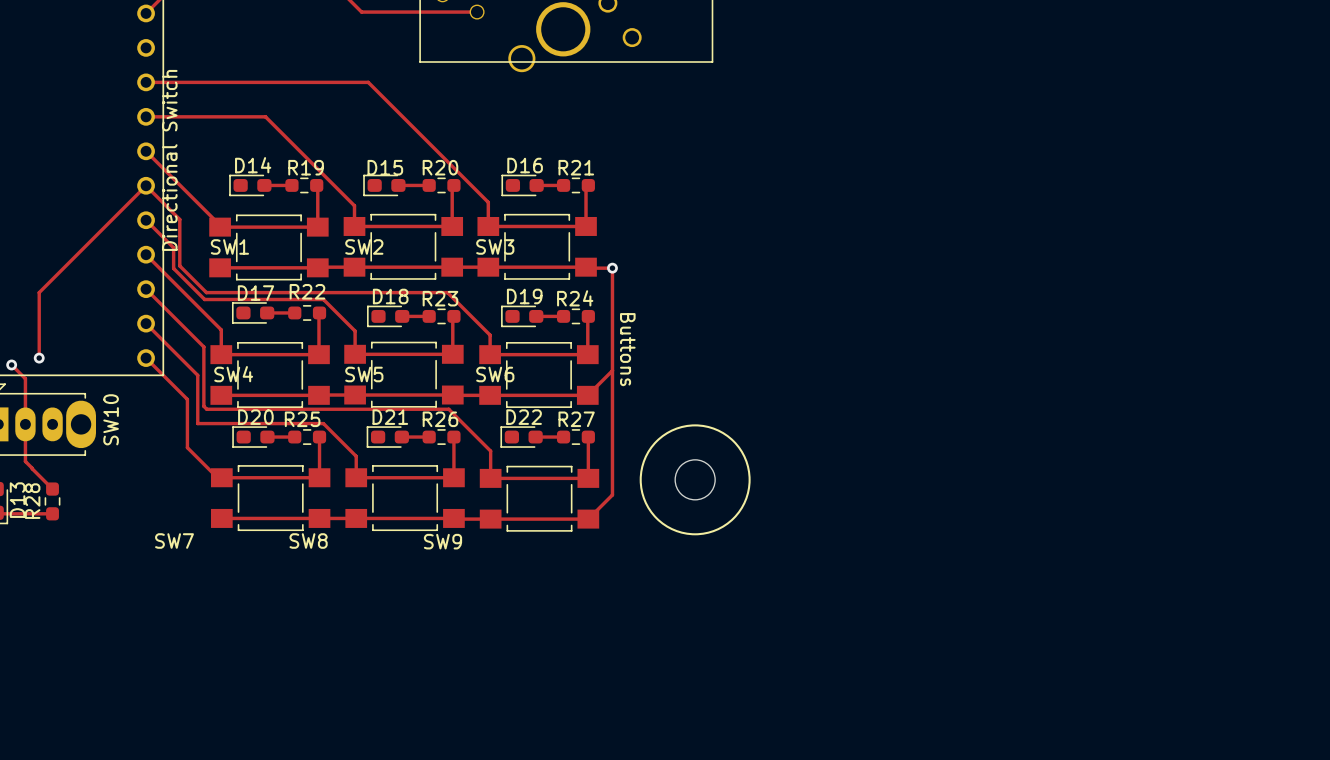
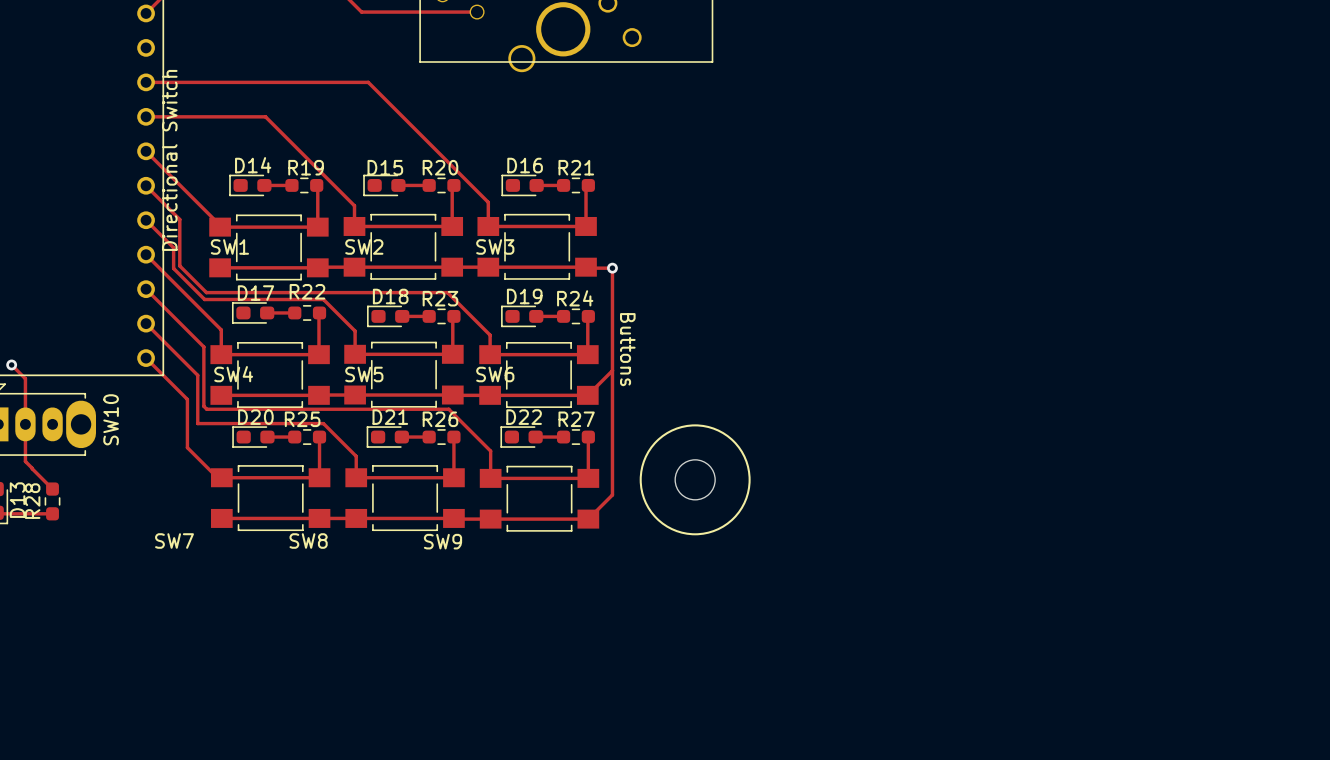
track: (141, 190) (39, 292) (39, 358) -> none
via: (39, 358) -> none

